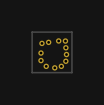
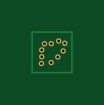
via: (65, 41) -> none
via: (48, 42) -> none
via: (41, 43) -> none
via: none -> (44, 43)
via: none -> (51, 43)
via: none -> (64, 43)
via: (65, 47) -> none
via: none -> (41, 49)
via: none -> (63, 50)
via: (41, 53) -> none
via: (66, 54) -> none
via: none -> (41, 56)
via: none -> (57, 57)
via: (40, 60) -> none
via: (65, 61) -> none
via: none -> (51, 62)
via: none -> (41, 63)
via: (46, 66) -> none
via: (61, 66) -> none
via: (54, 67) -> none

